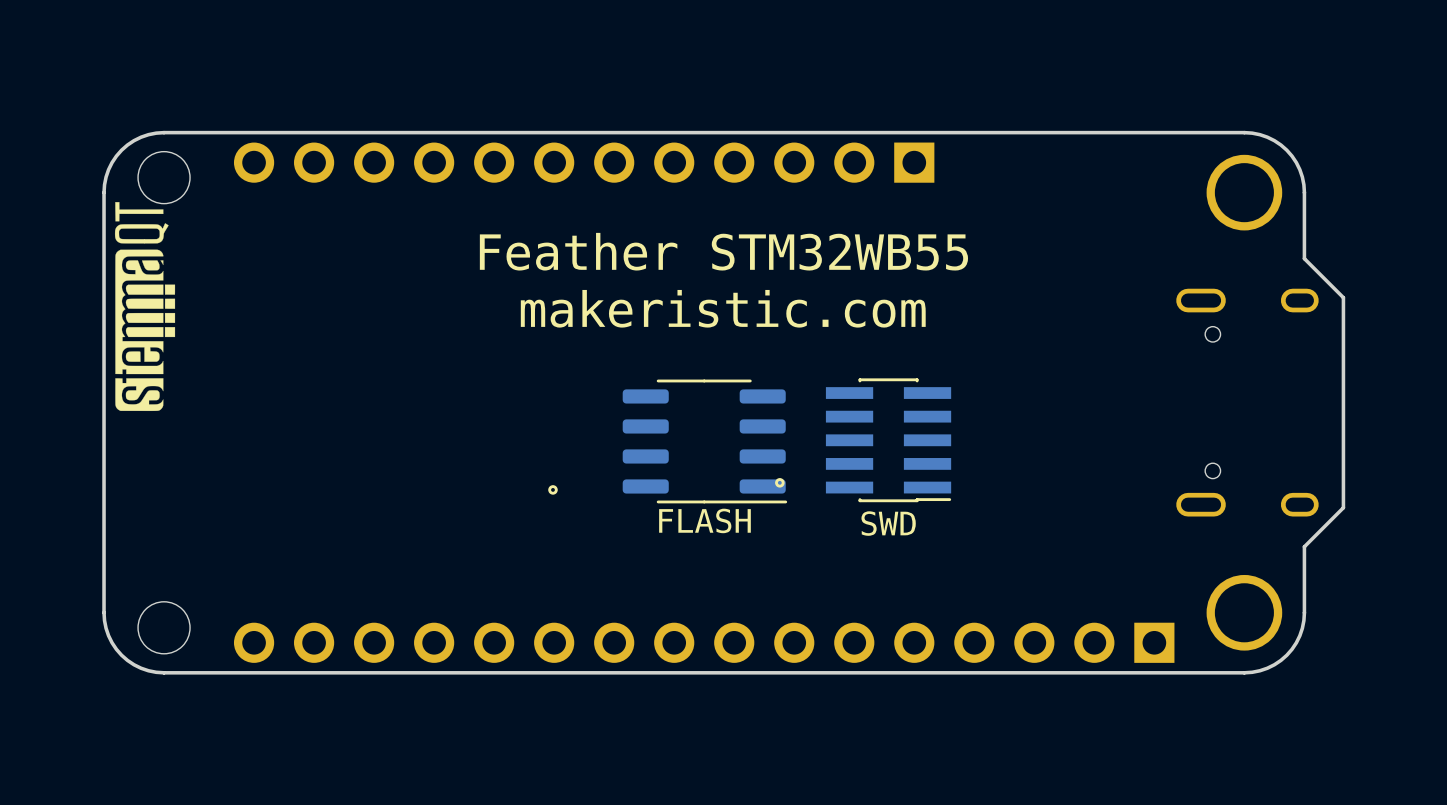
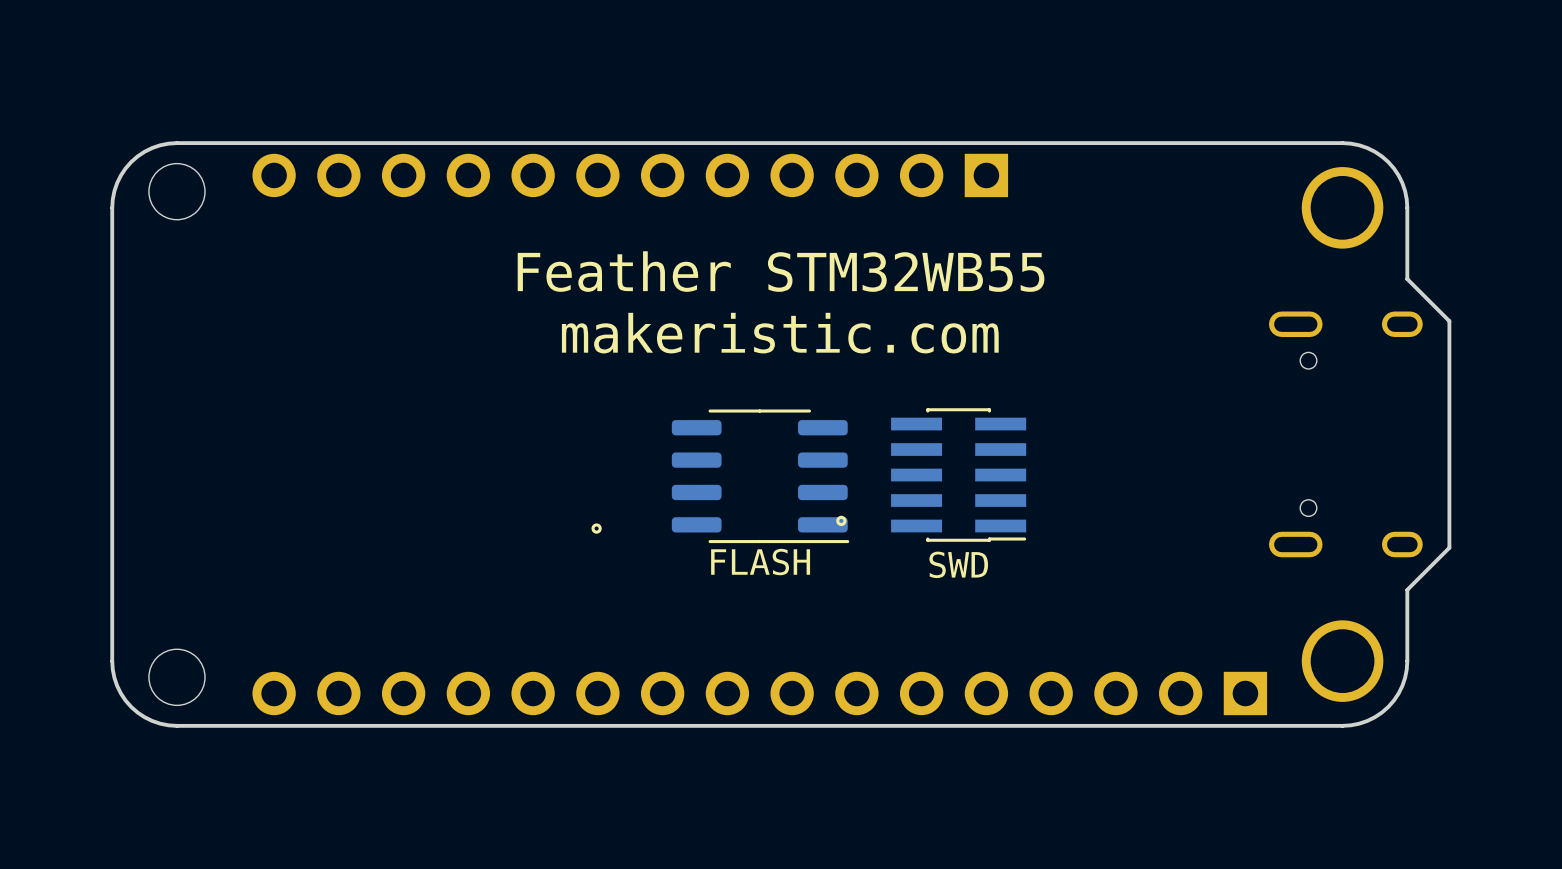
drawing: [114, 202, 176, 412] -> none

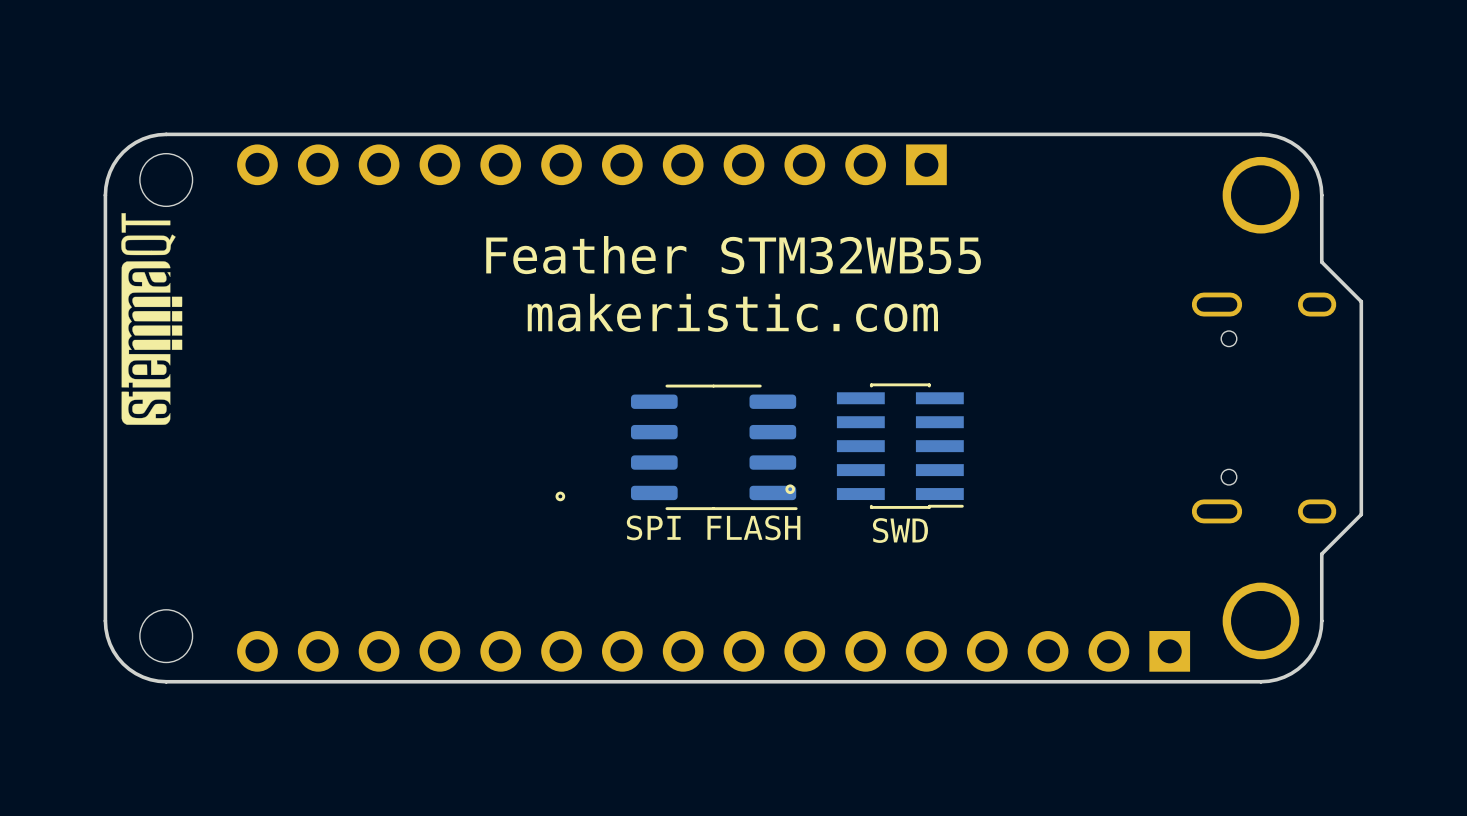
drawing: none -> [121, 213, 183, 425]
FLASH name: FLASH (760, 562) -> SPI FLASH (713, 527)

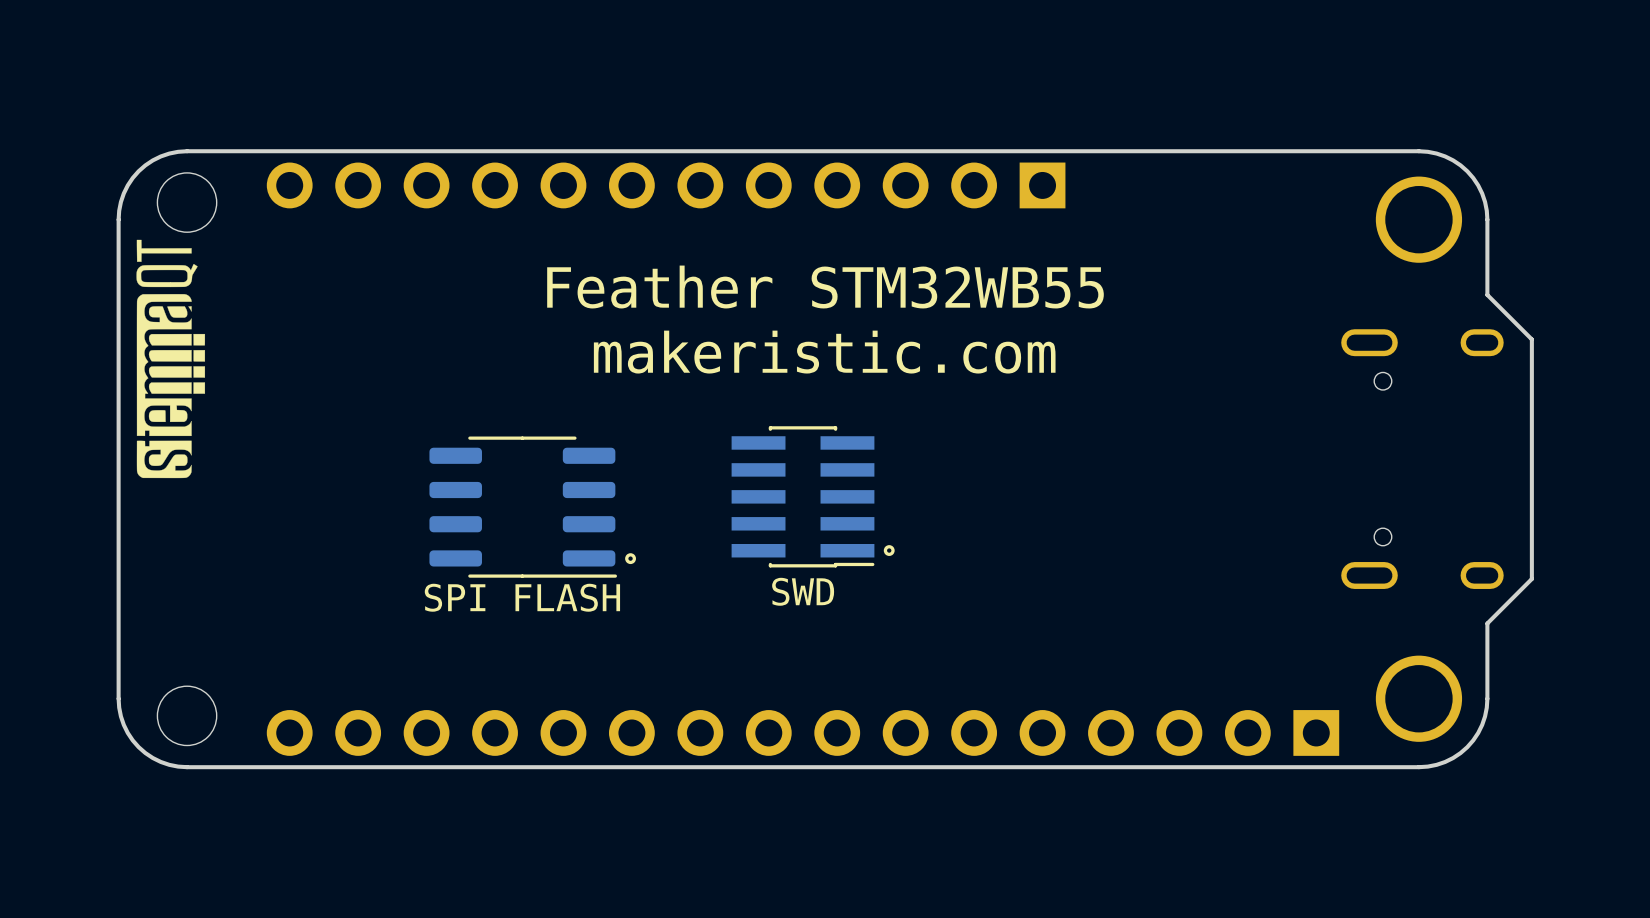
SWD position: (900, 446) -> (803, 496)
SPI FLASH position: (714, 447) -> (523, 507)

